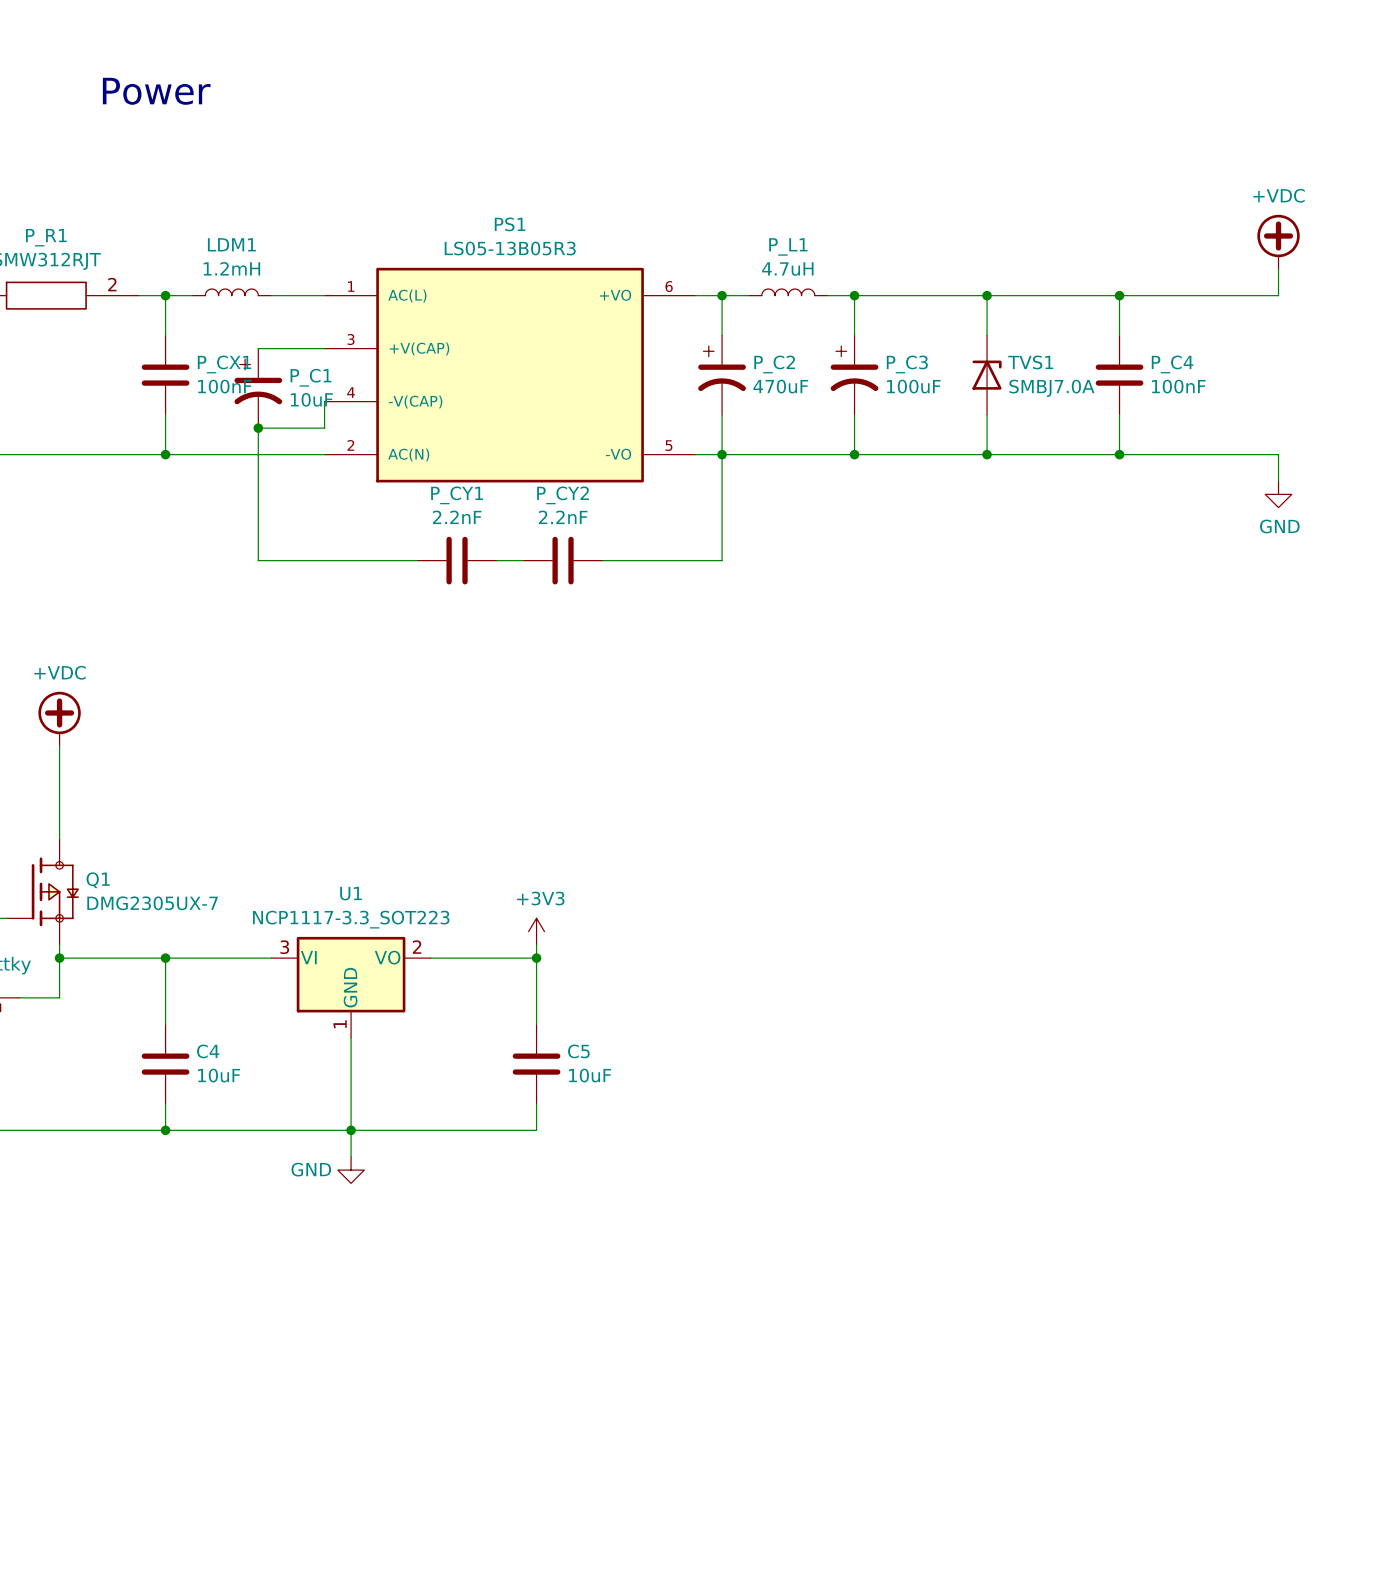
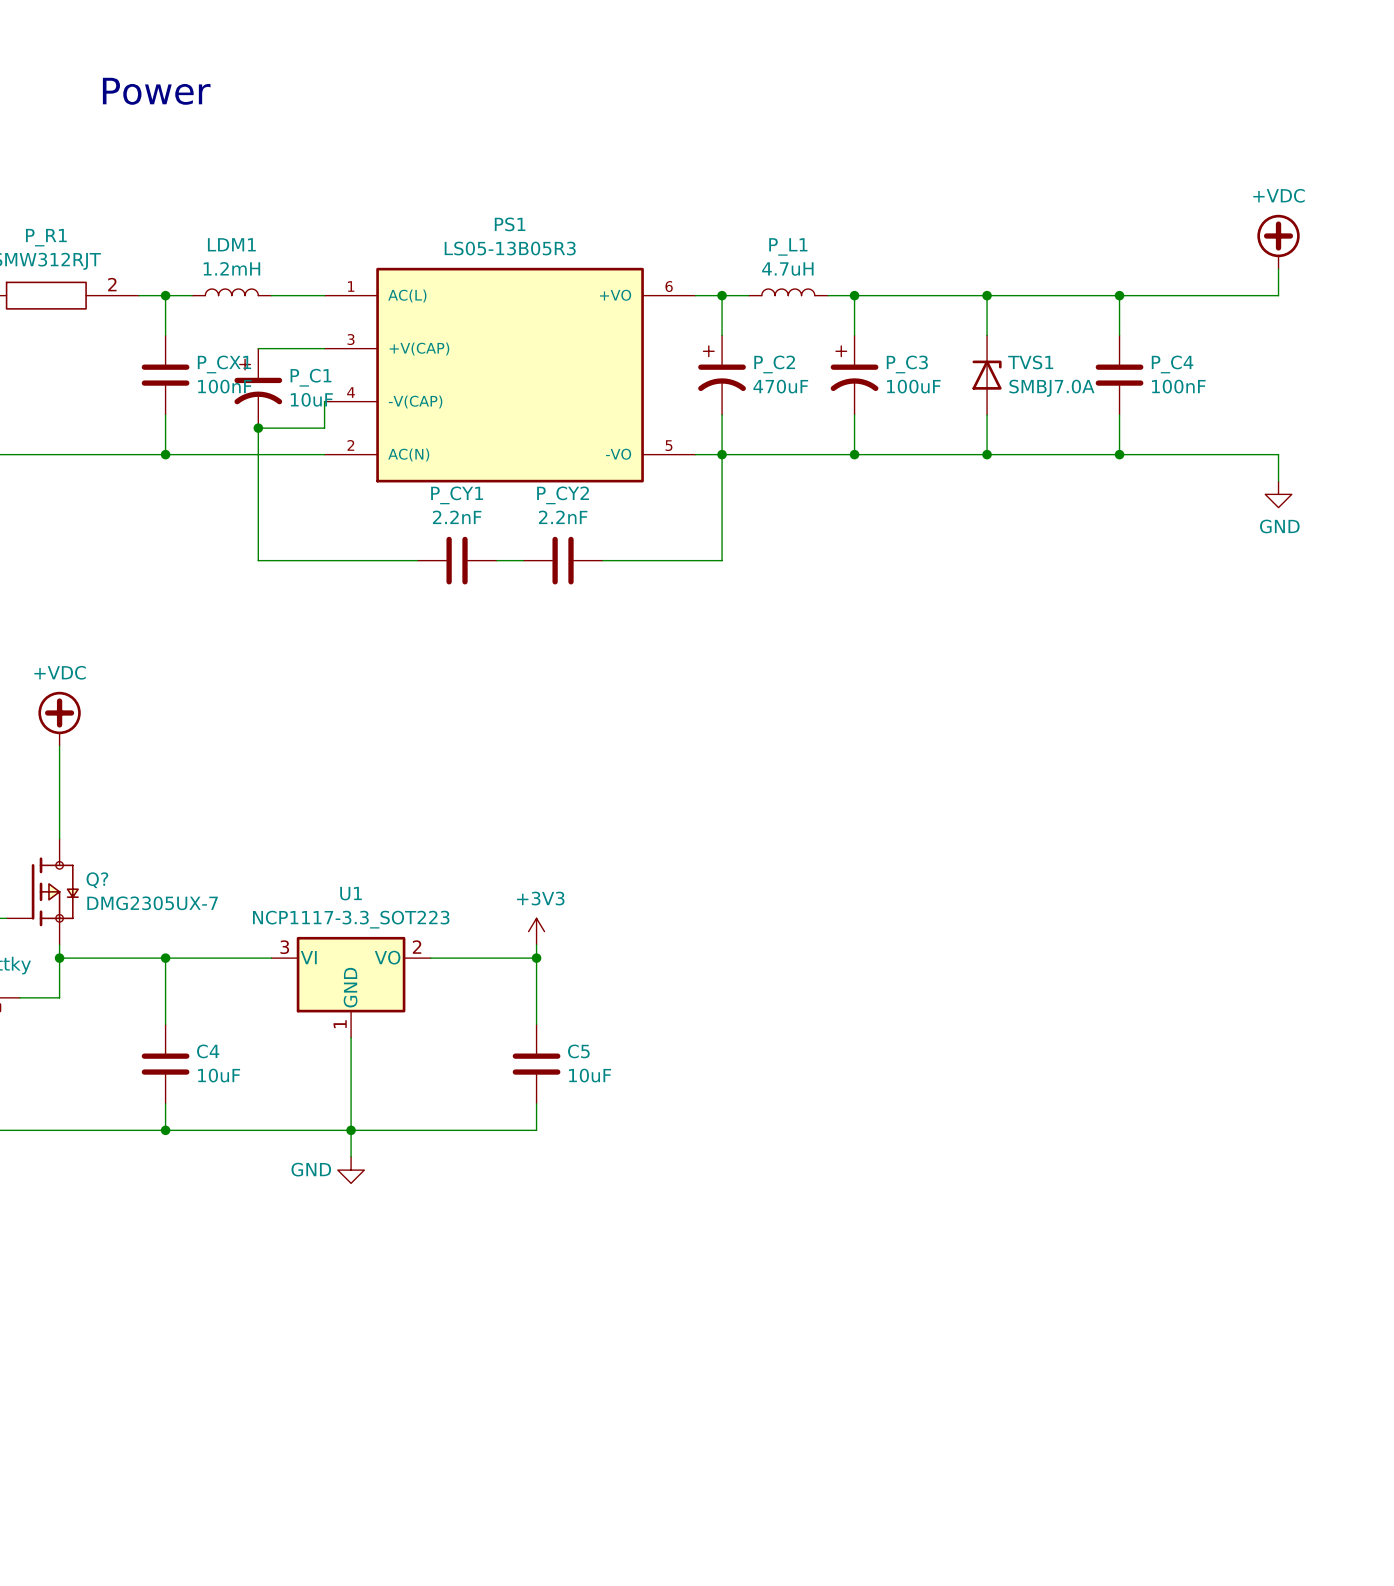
Q1 name: Q1 (98, 880) -> Q? (97, 880)

